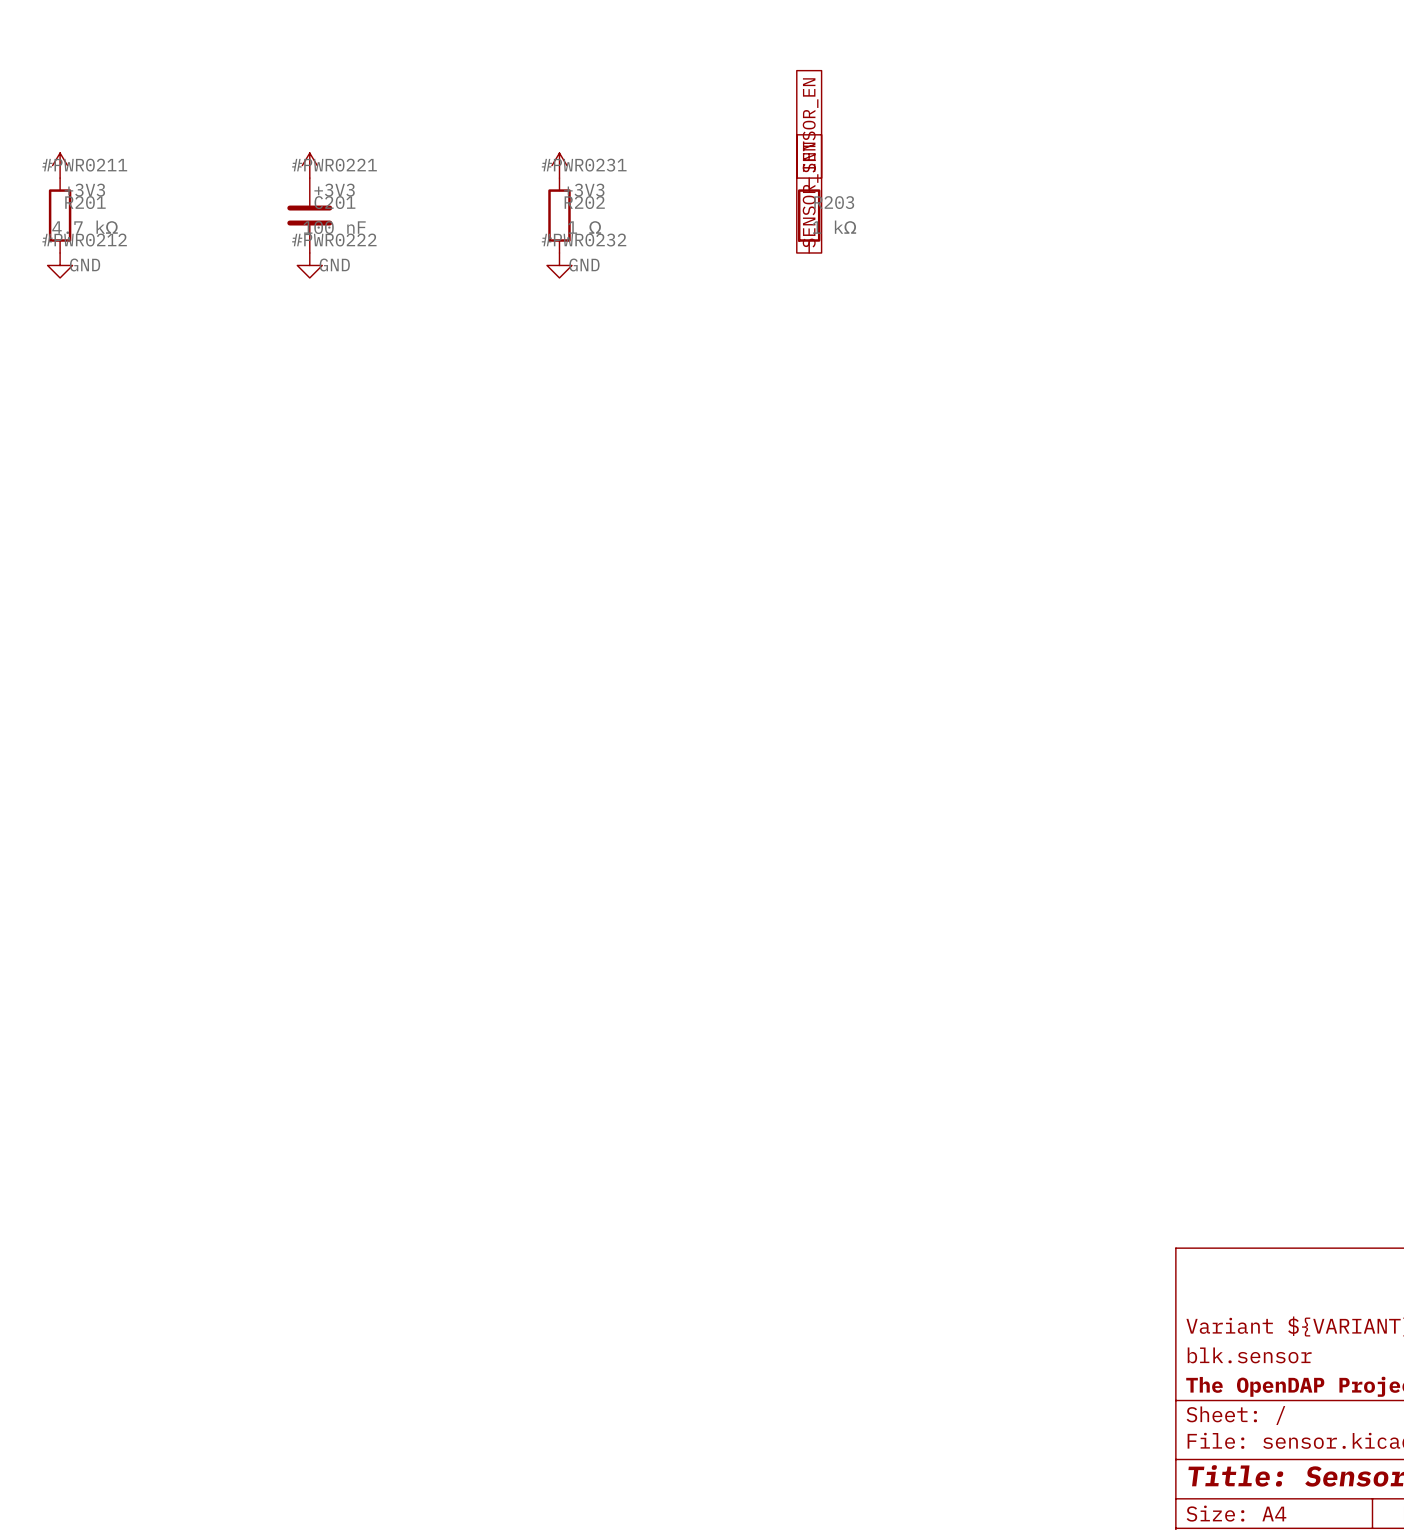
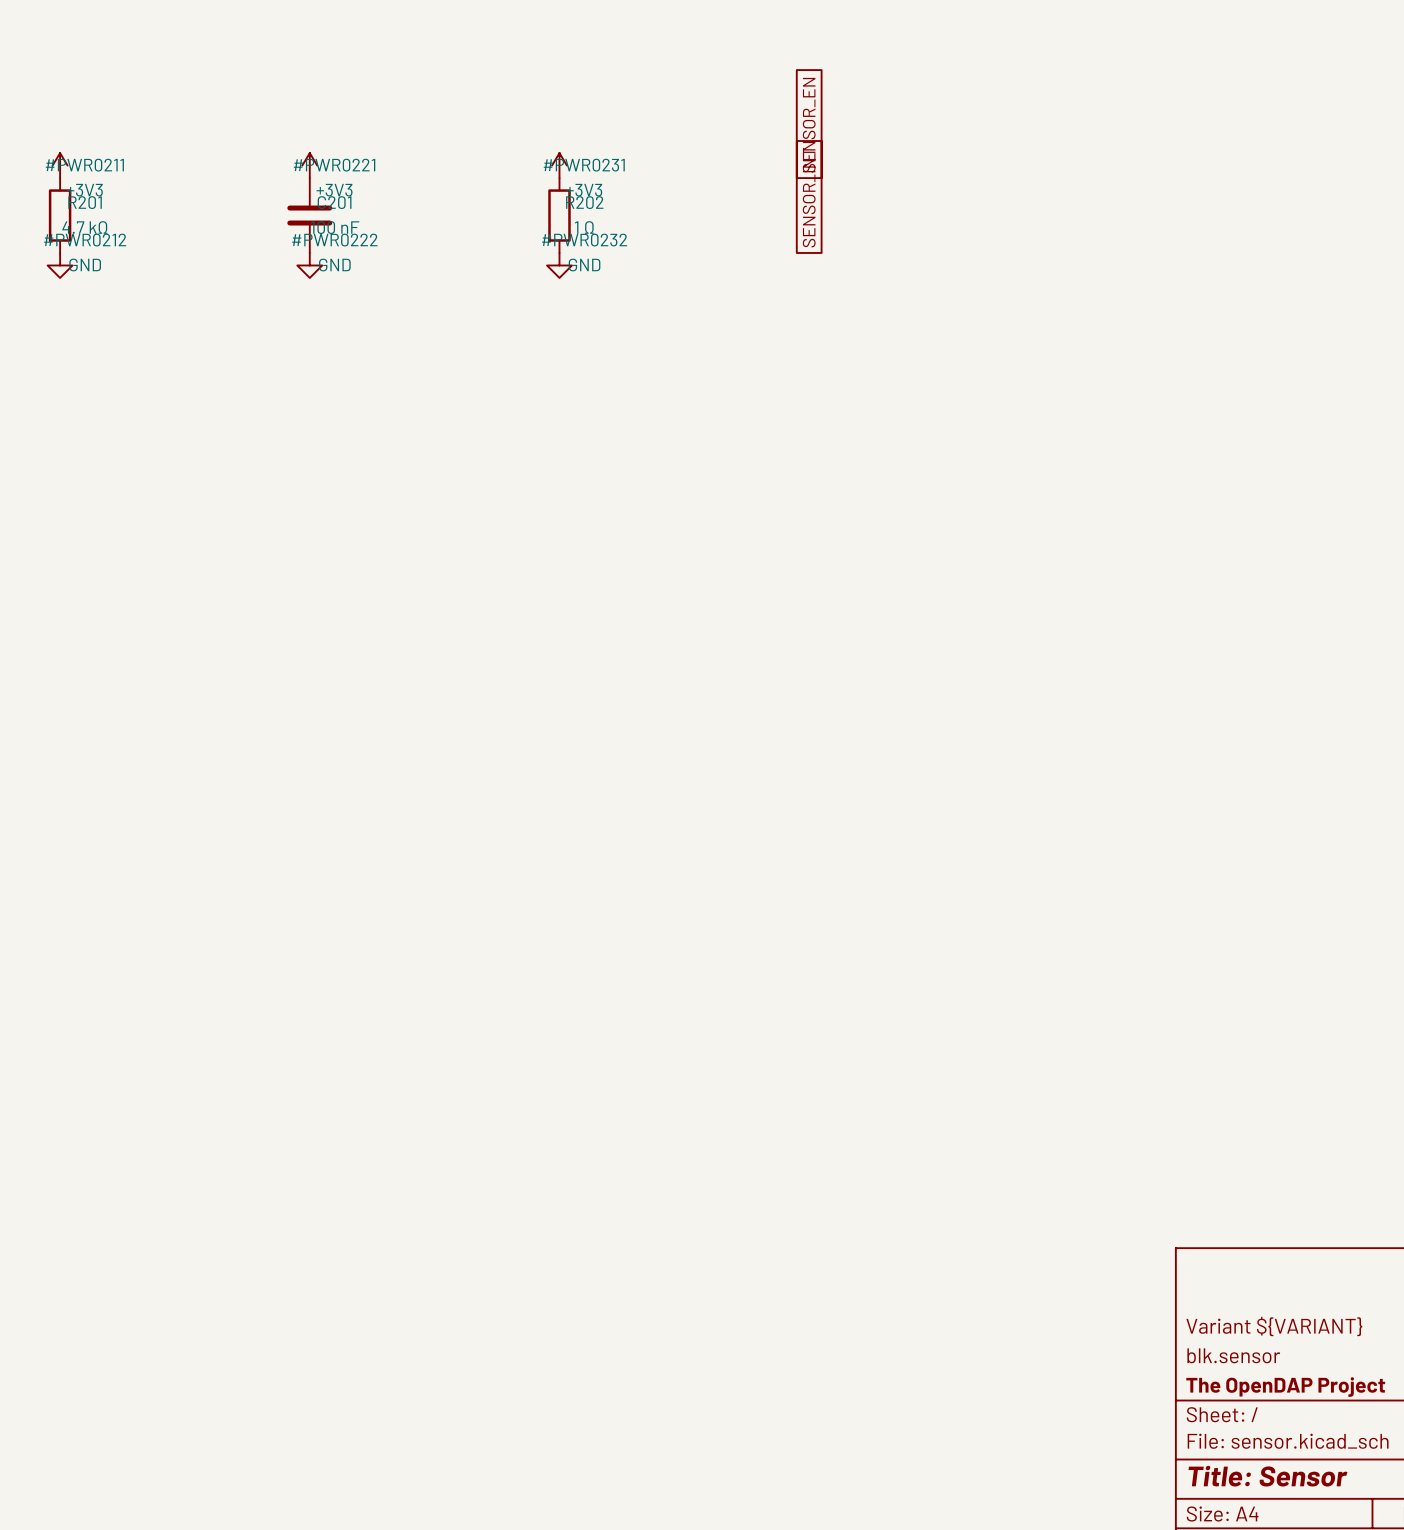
R203: 1 kΩ (809, 215) -> none

